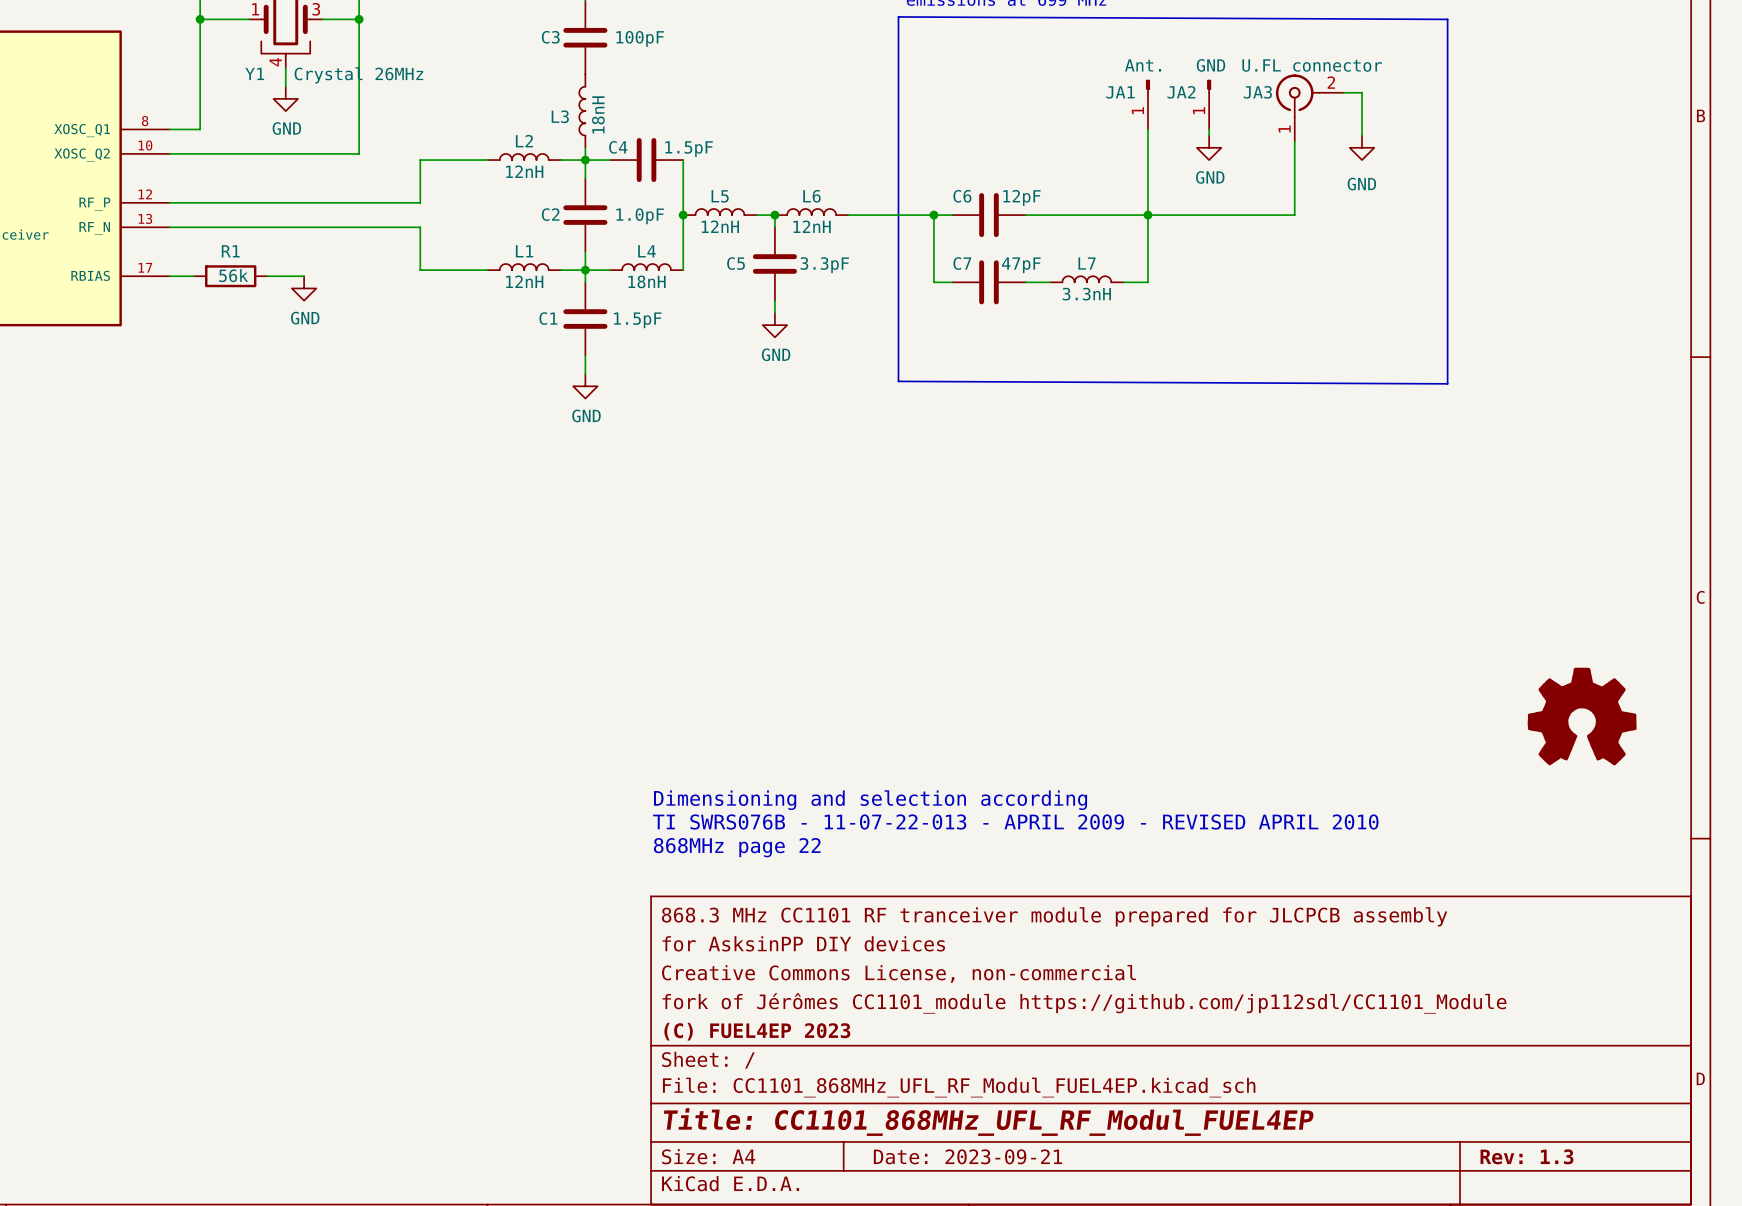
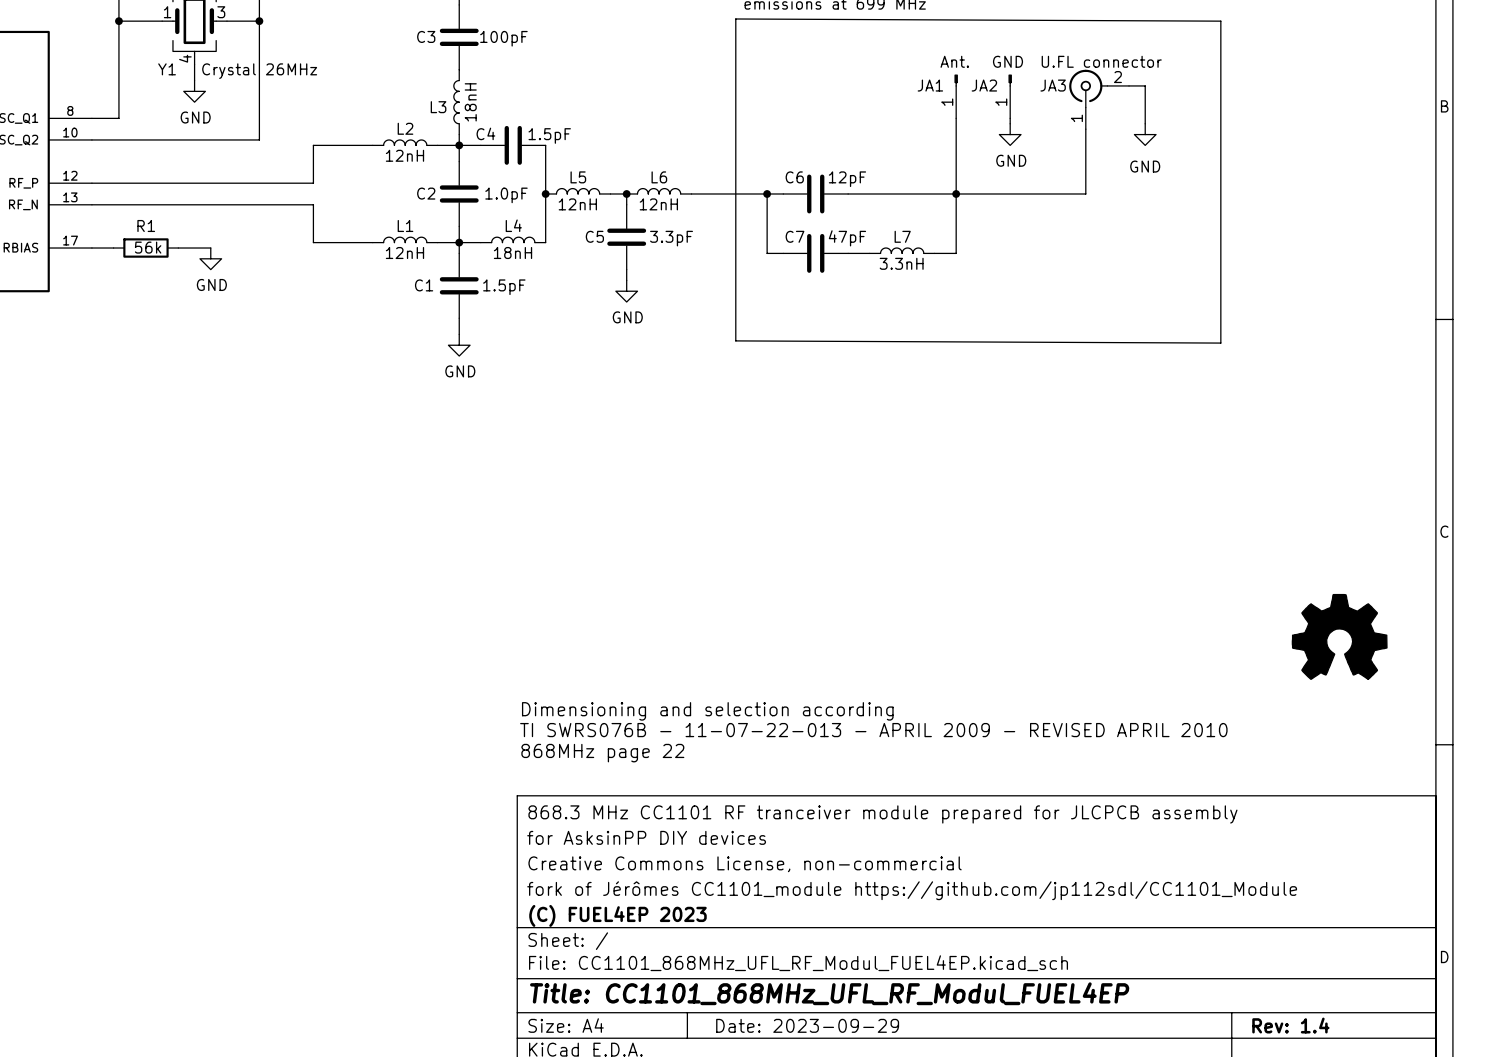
title block: Date: 2023-09-21 (967, 1156) -> Date: 2023-09-29 (807, 1025)
title block: Rev: 1.3 (1526, 1156) -> Rev: 1.4 (1290, 1025)

